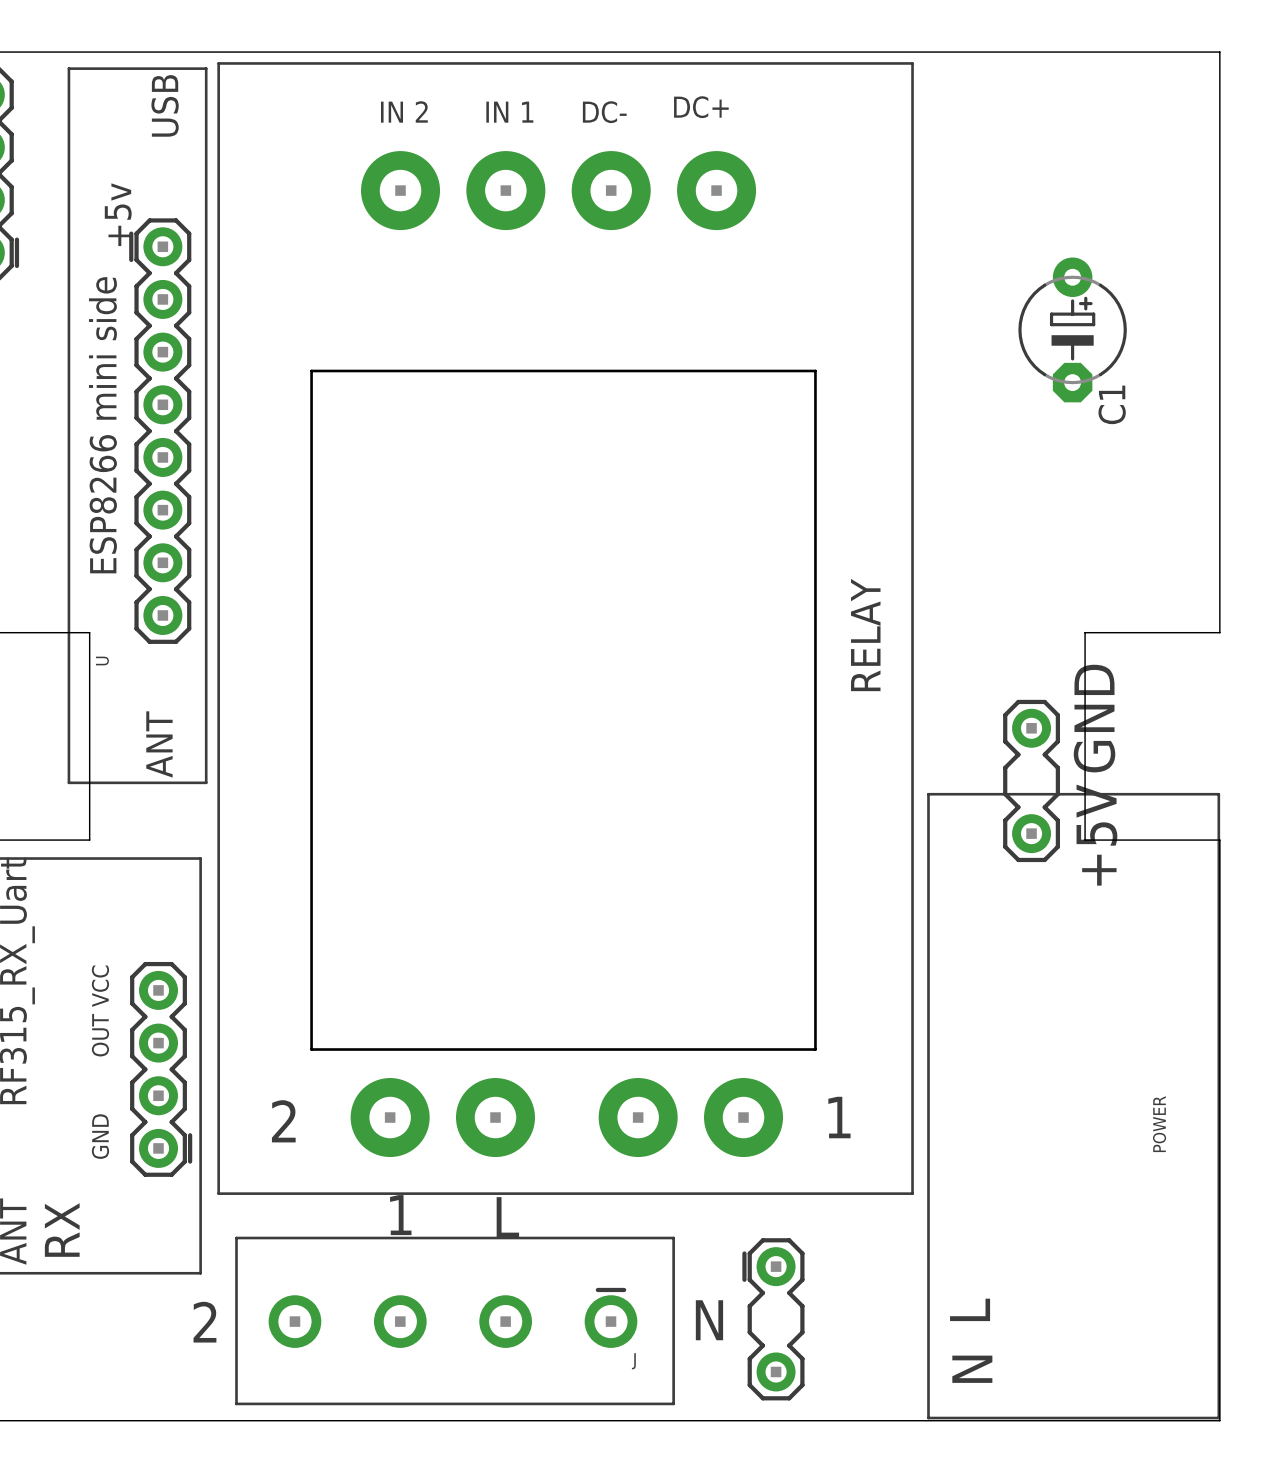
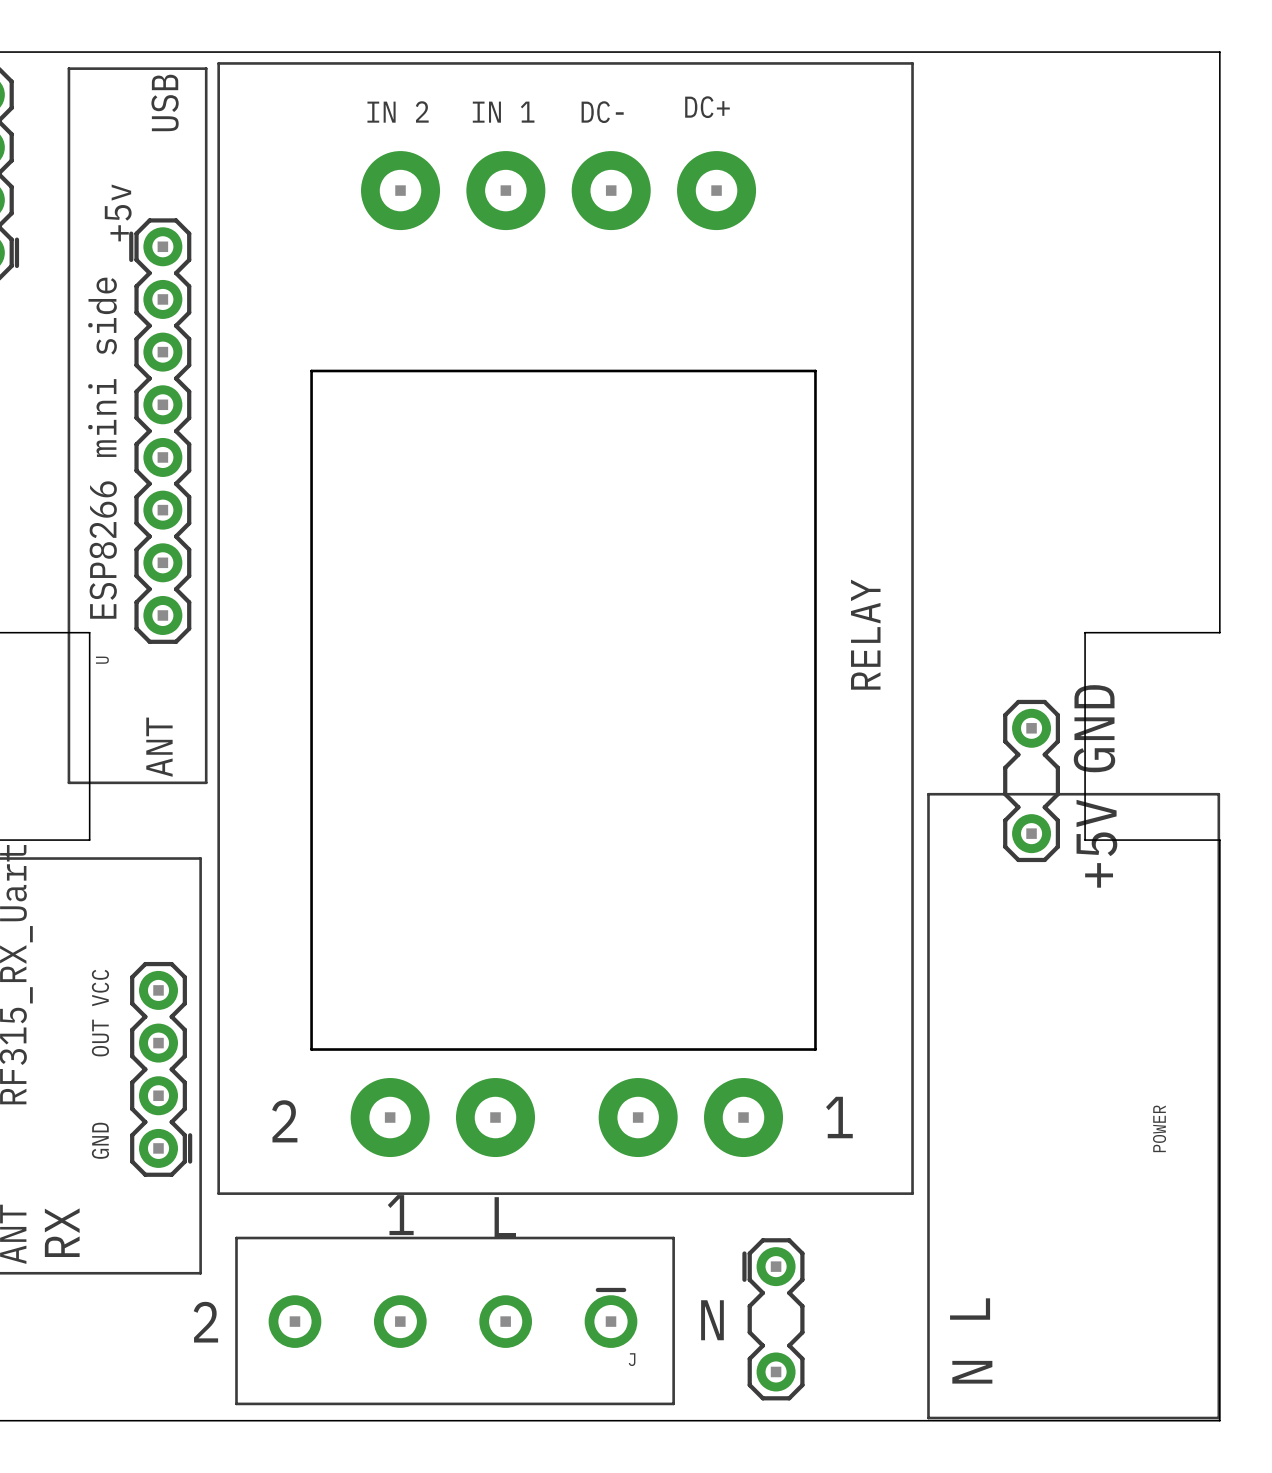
C1: (1072, 329) -> none

